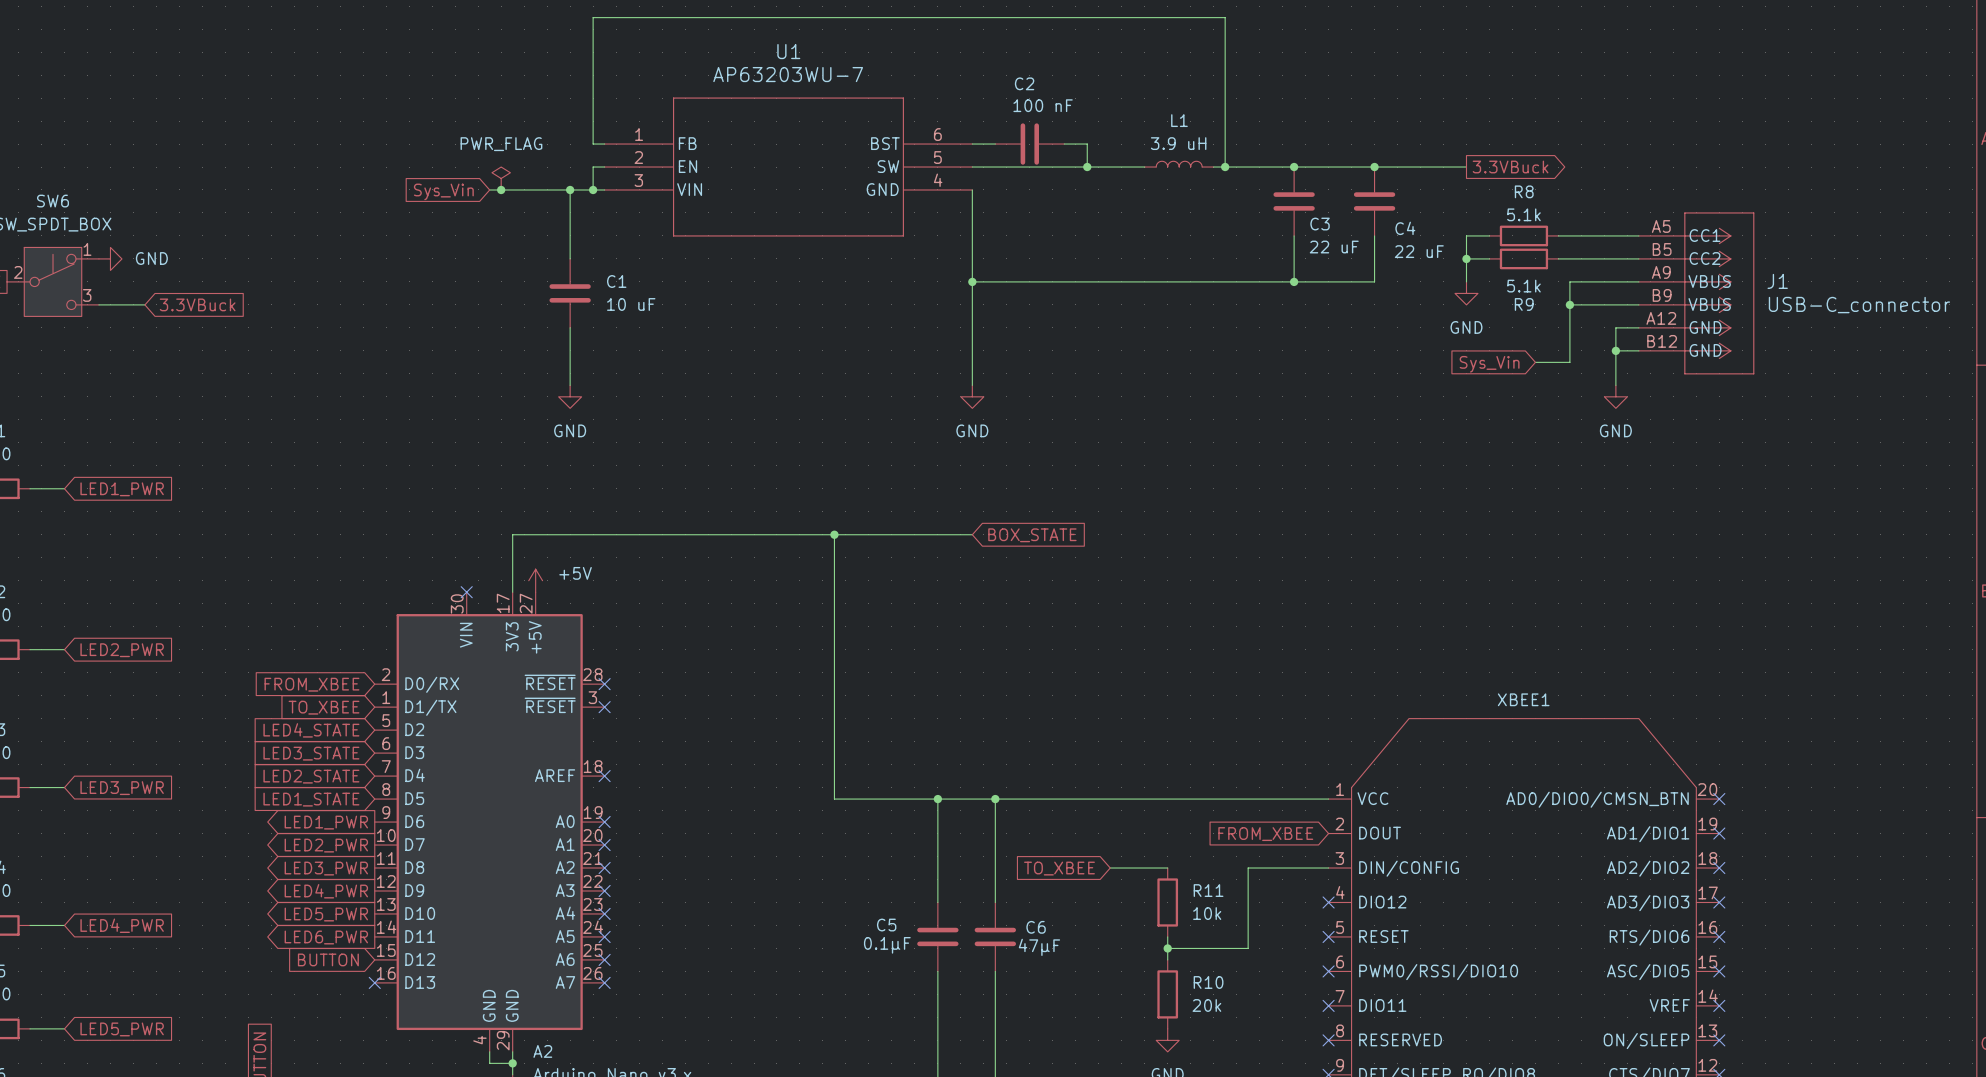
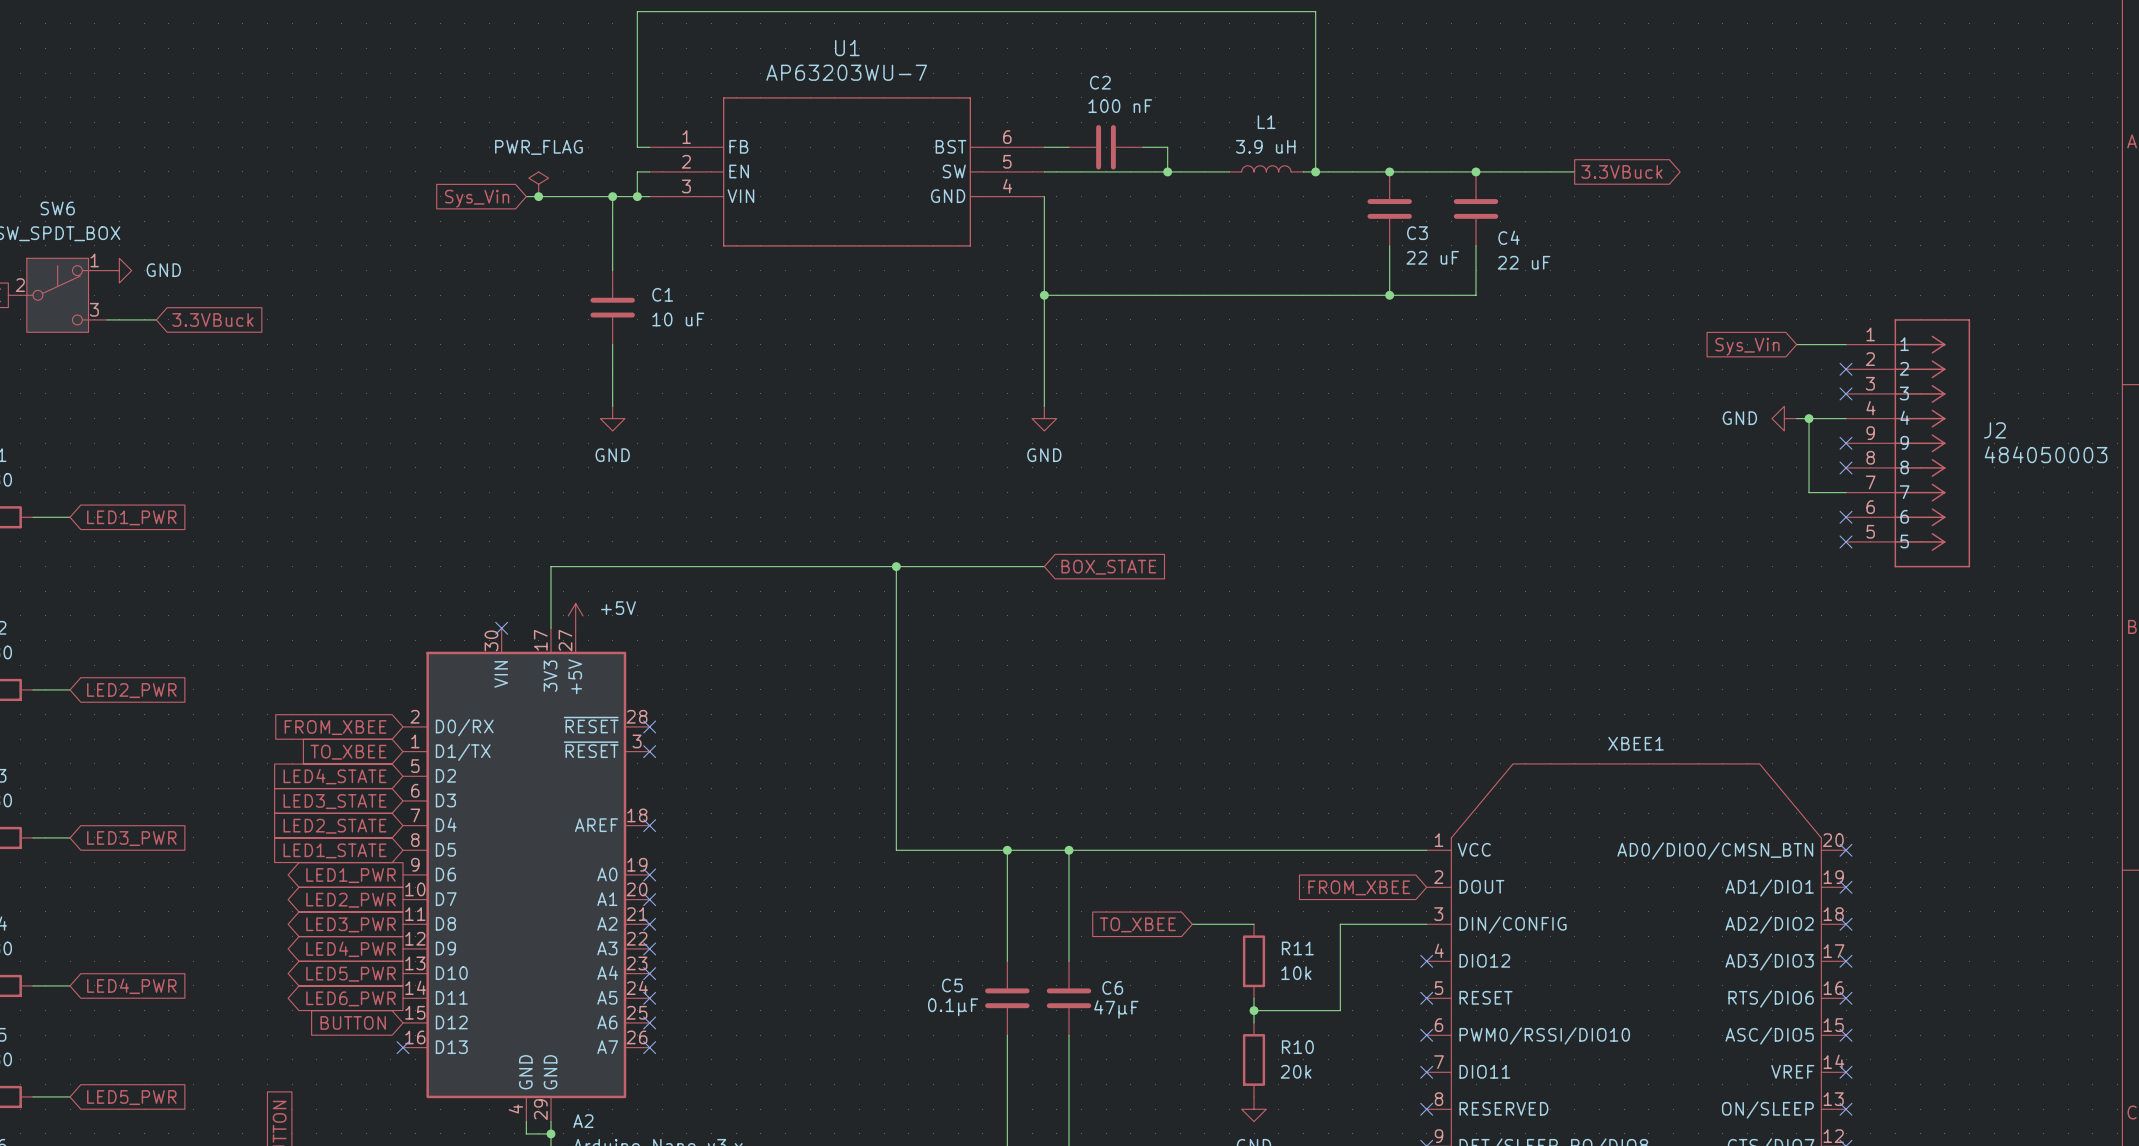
wire: (1489, 235) (1466, 235) (1466, 281) -> none
R8: 5.1k (1523, 235) -> none
wire: (1558, 235) (1638, 235) -> none
wire: (1466, 258) (1489, 258) -> none
junction: (1466, 258) -> none
R9: 5.1k (1523, 258) -> none
wire: (1558, 258) (1638, 258) -> none
wire: (1638, 281) (1569, 281) (1569, 362) (1535, 362) -> none
power symbol: GND (1466, 293) -> none
J1: USB-C_connector (1696, 293) -> none
wire: (1569, 304) (1638, 304) -> none
junction: (1569, 304) -> none
wire: (1638, 327) (1615, 327) (1615, 385) -> none
wire: (1615, 350) (1638, 350) -> none
junction: (1615, 350) -> none
no-connect mark: none -> (1846, 369)
global label position: Sys_Vin (1489, 364) -> Sys_Vin (1747, 346)
no-connect mark: none -> (1846, 393)
power symbol rotation: 0° (1615, 396) -> 90° clockwise (1784, 418)
power symbol position: GND (1615, 396) -> GND (1784, 418)
wire: none -> (1796, 418) (1846, 418)
wire: none -> (1809, 418) (1809, 492) (1846, 492)
junction: none -> (1809, 418)
no-connect mark: none -> (1846, 443)
J2: none -> 484050003 (1908, 443)
no-connect mark: none -> (1846, 467)
no-connect mark: none -> (1846, 517)
no-connect mark: none -> (1846, 541)

